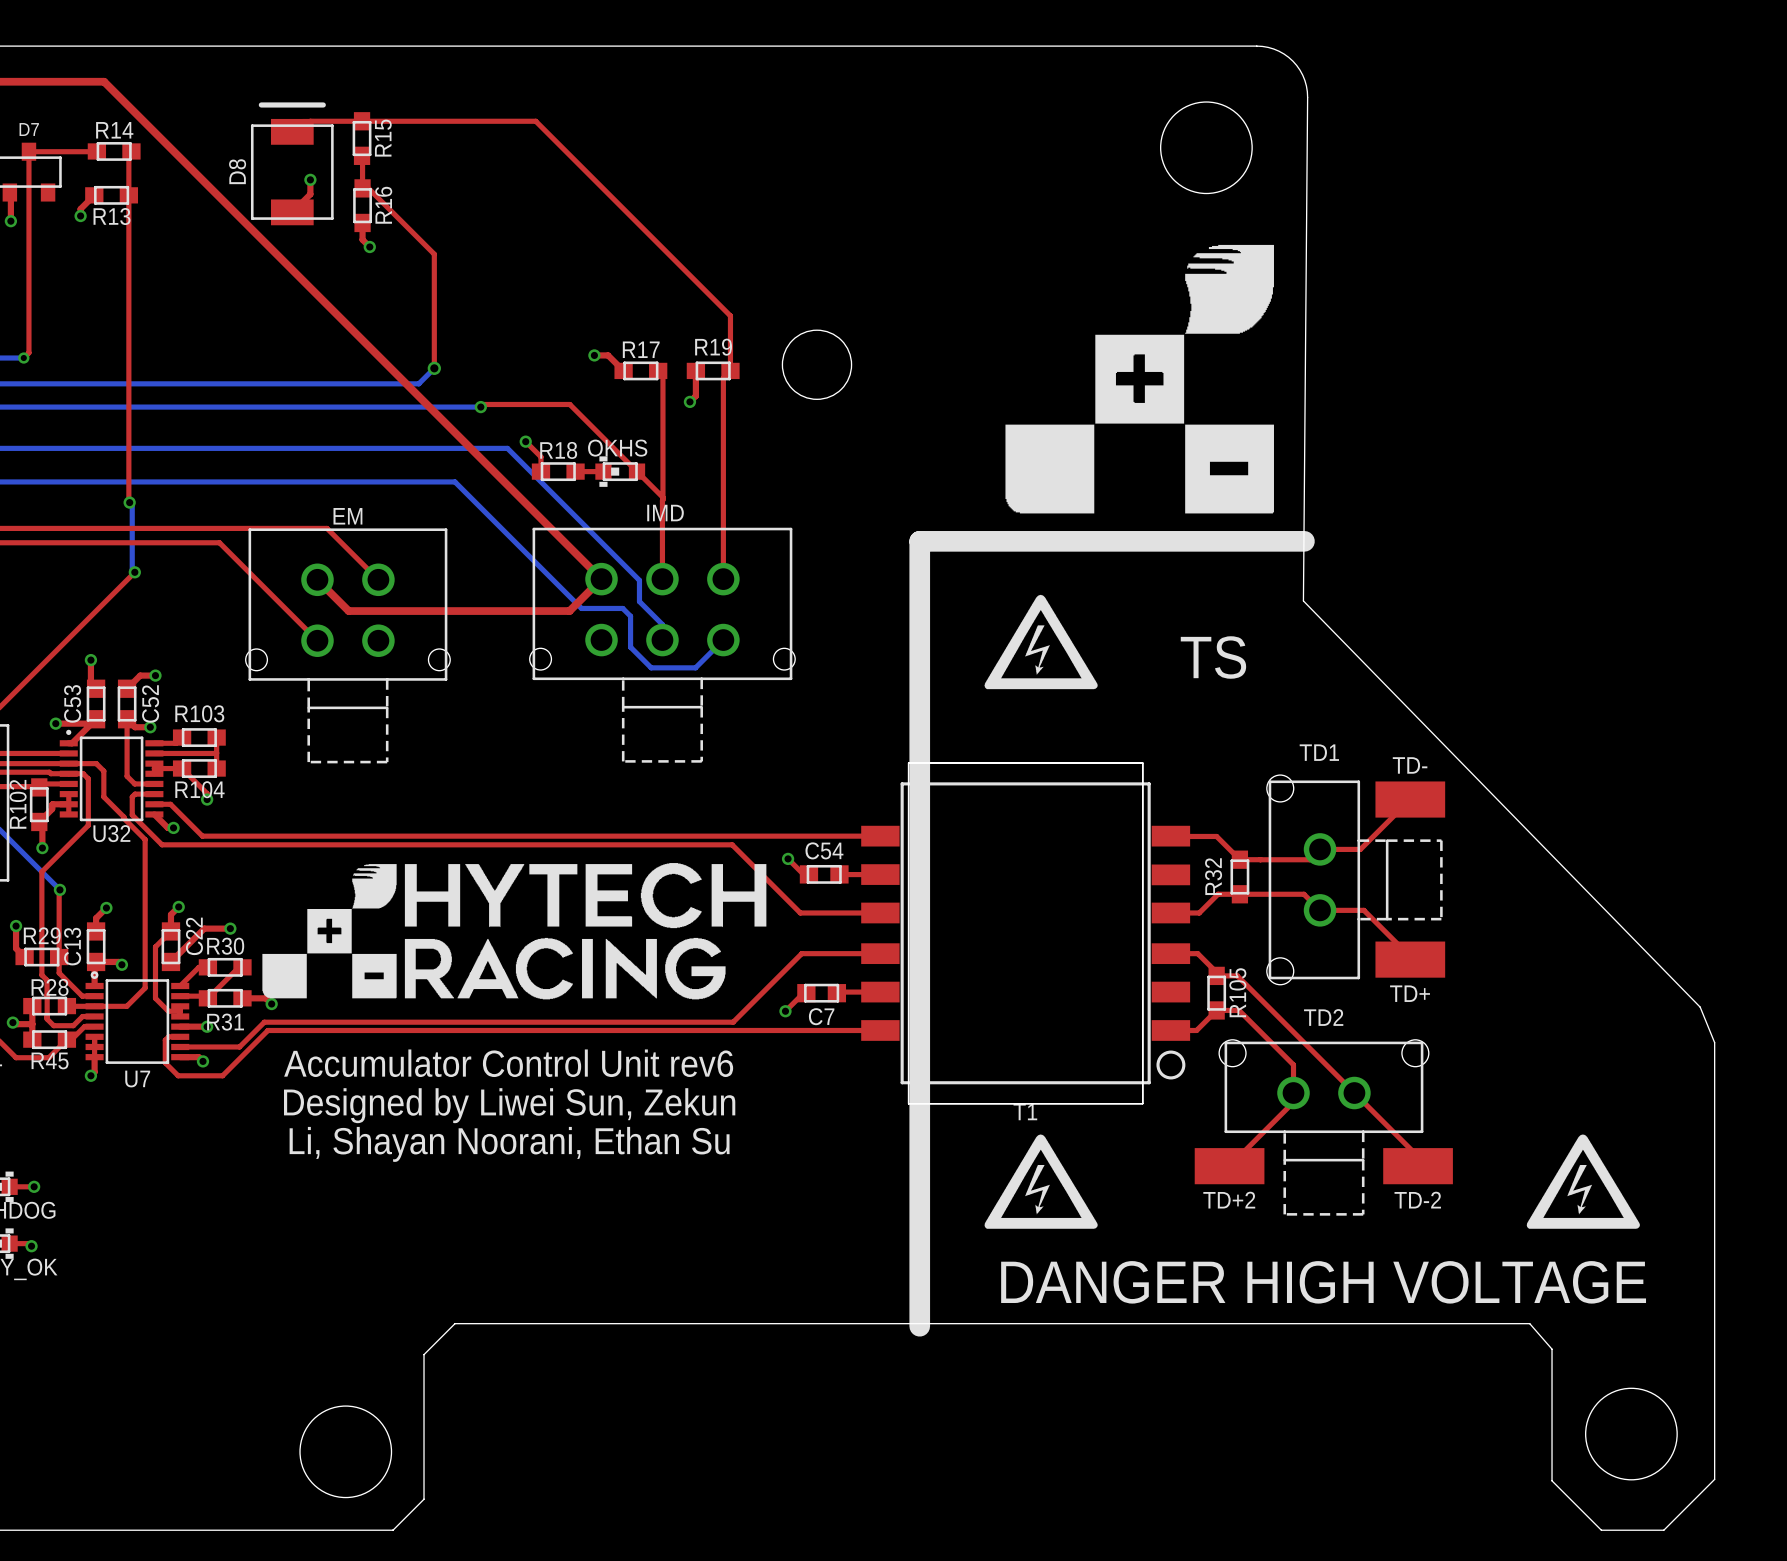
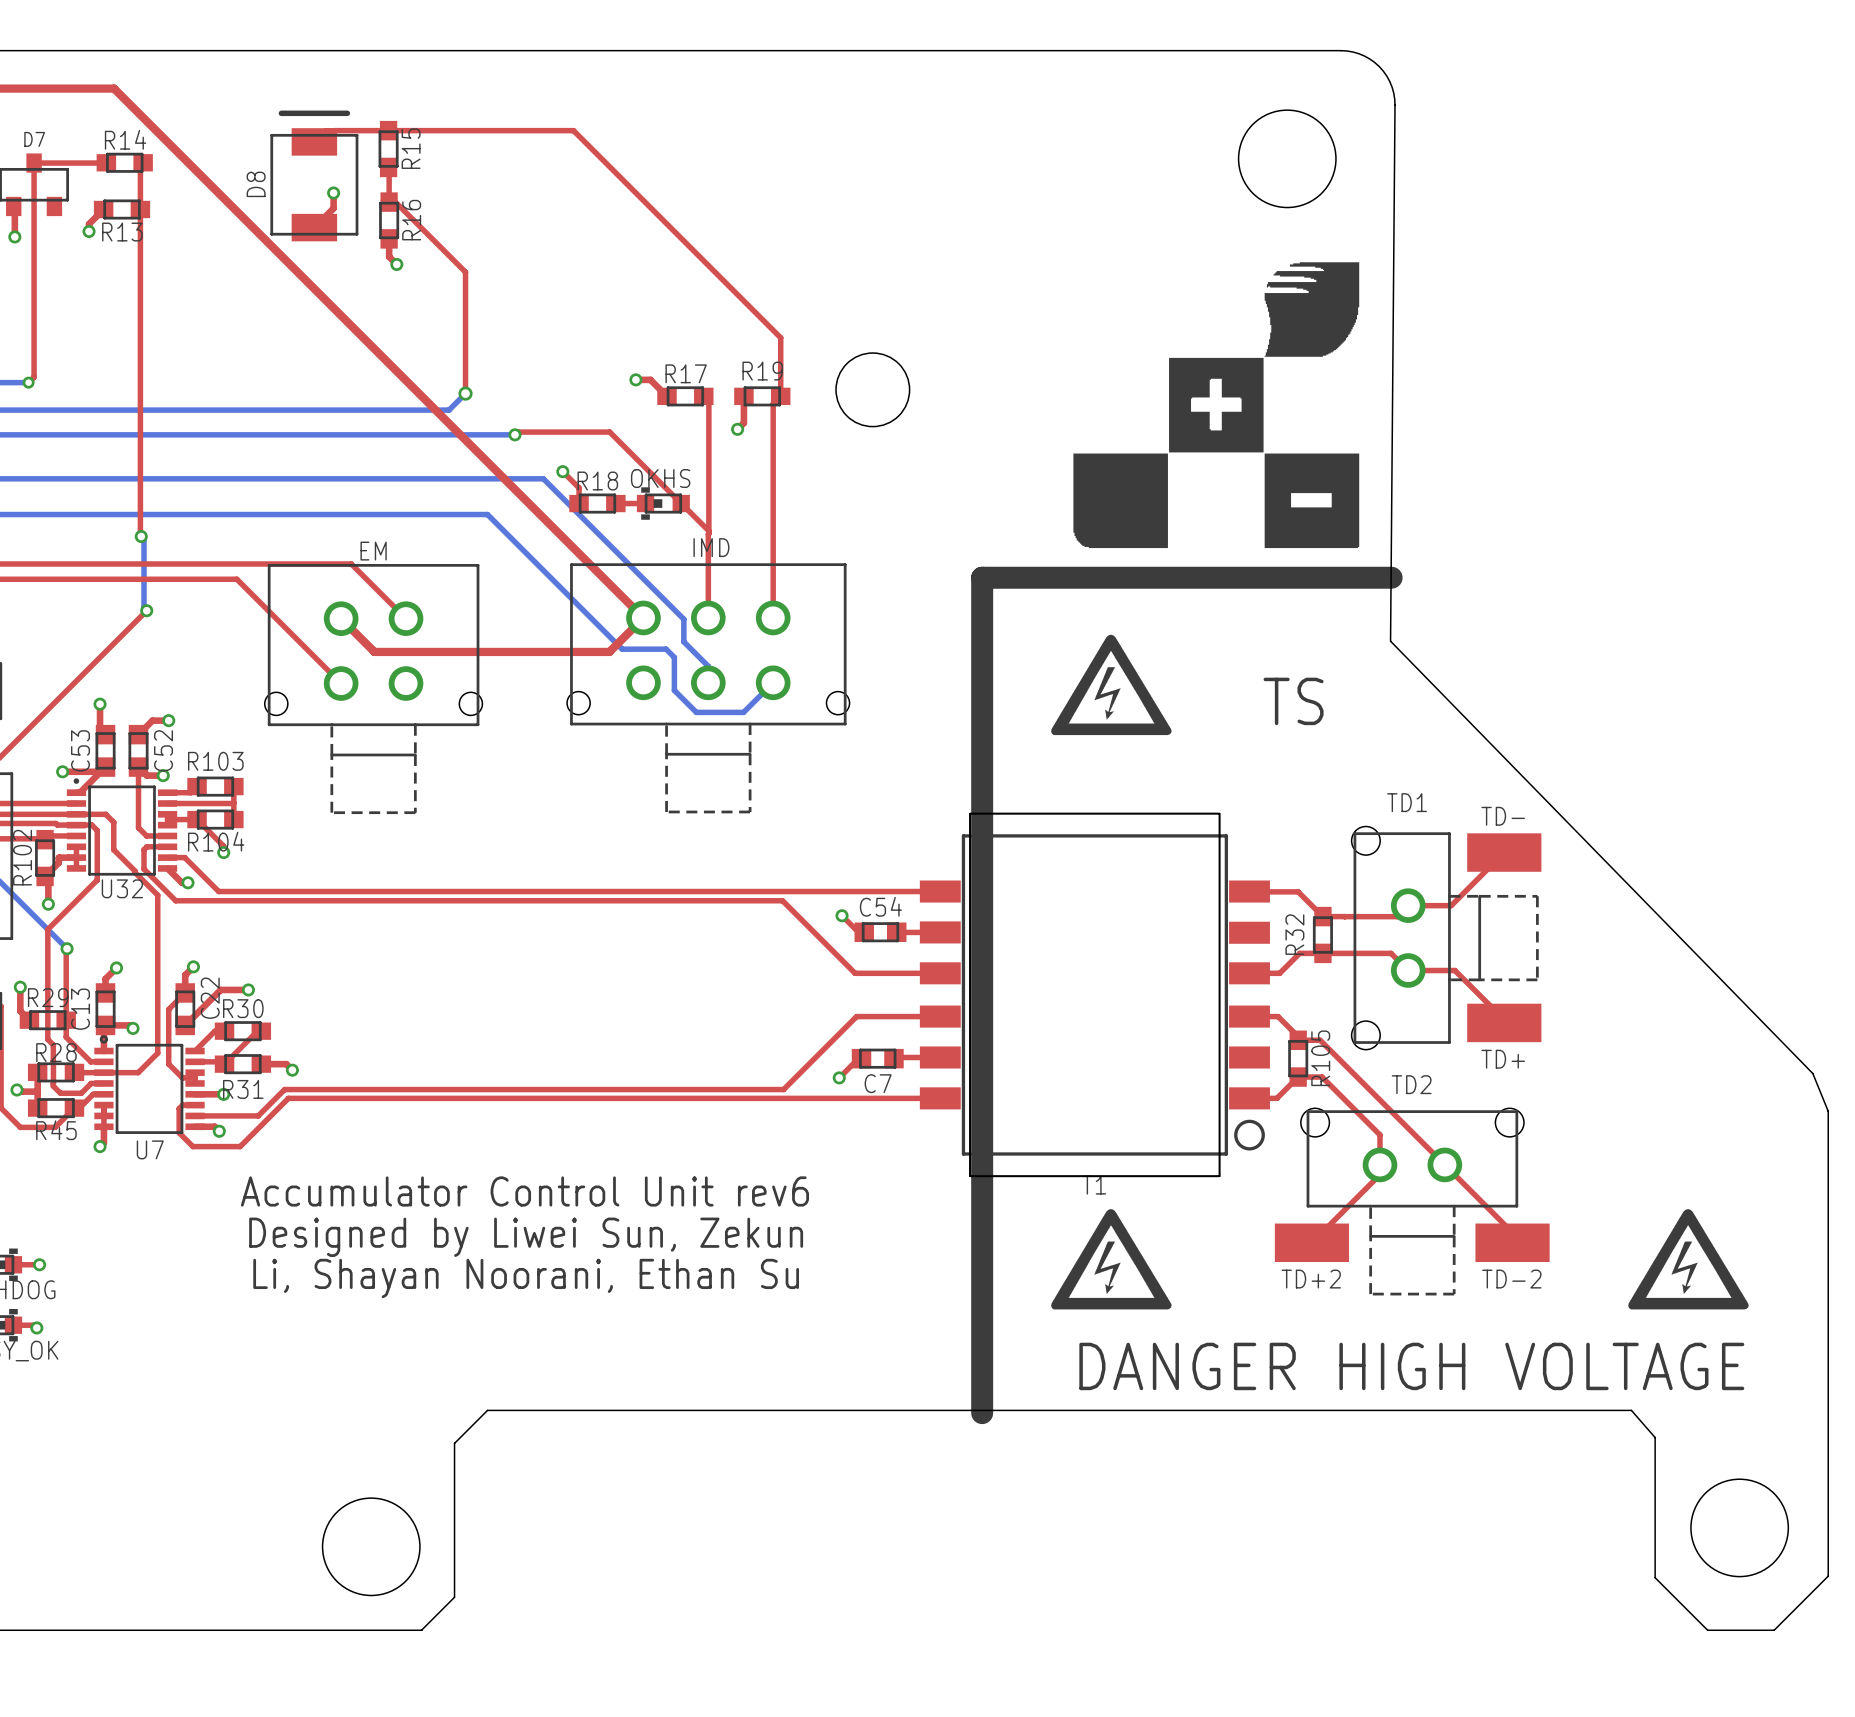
drawing: [262, 863, 767, 1000] -> none
text position: Accumulator Control Unit rev6 (508, 1063) -> Accumulator Control Unit rev6 (524, 1191)
text position: Designed by Liwei Sun, Zekun (509, 1105) -> Designed by Liwei Sun, Zekun (526, 1237)
text position: Li, Shayan Noorani, Ethan Su (509, 1144) -> Li, Shayan Noorani, Ethan Su (526, 1278)

